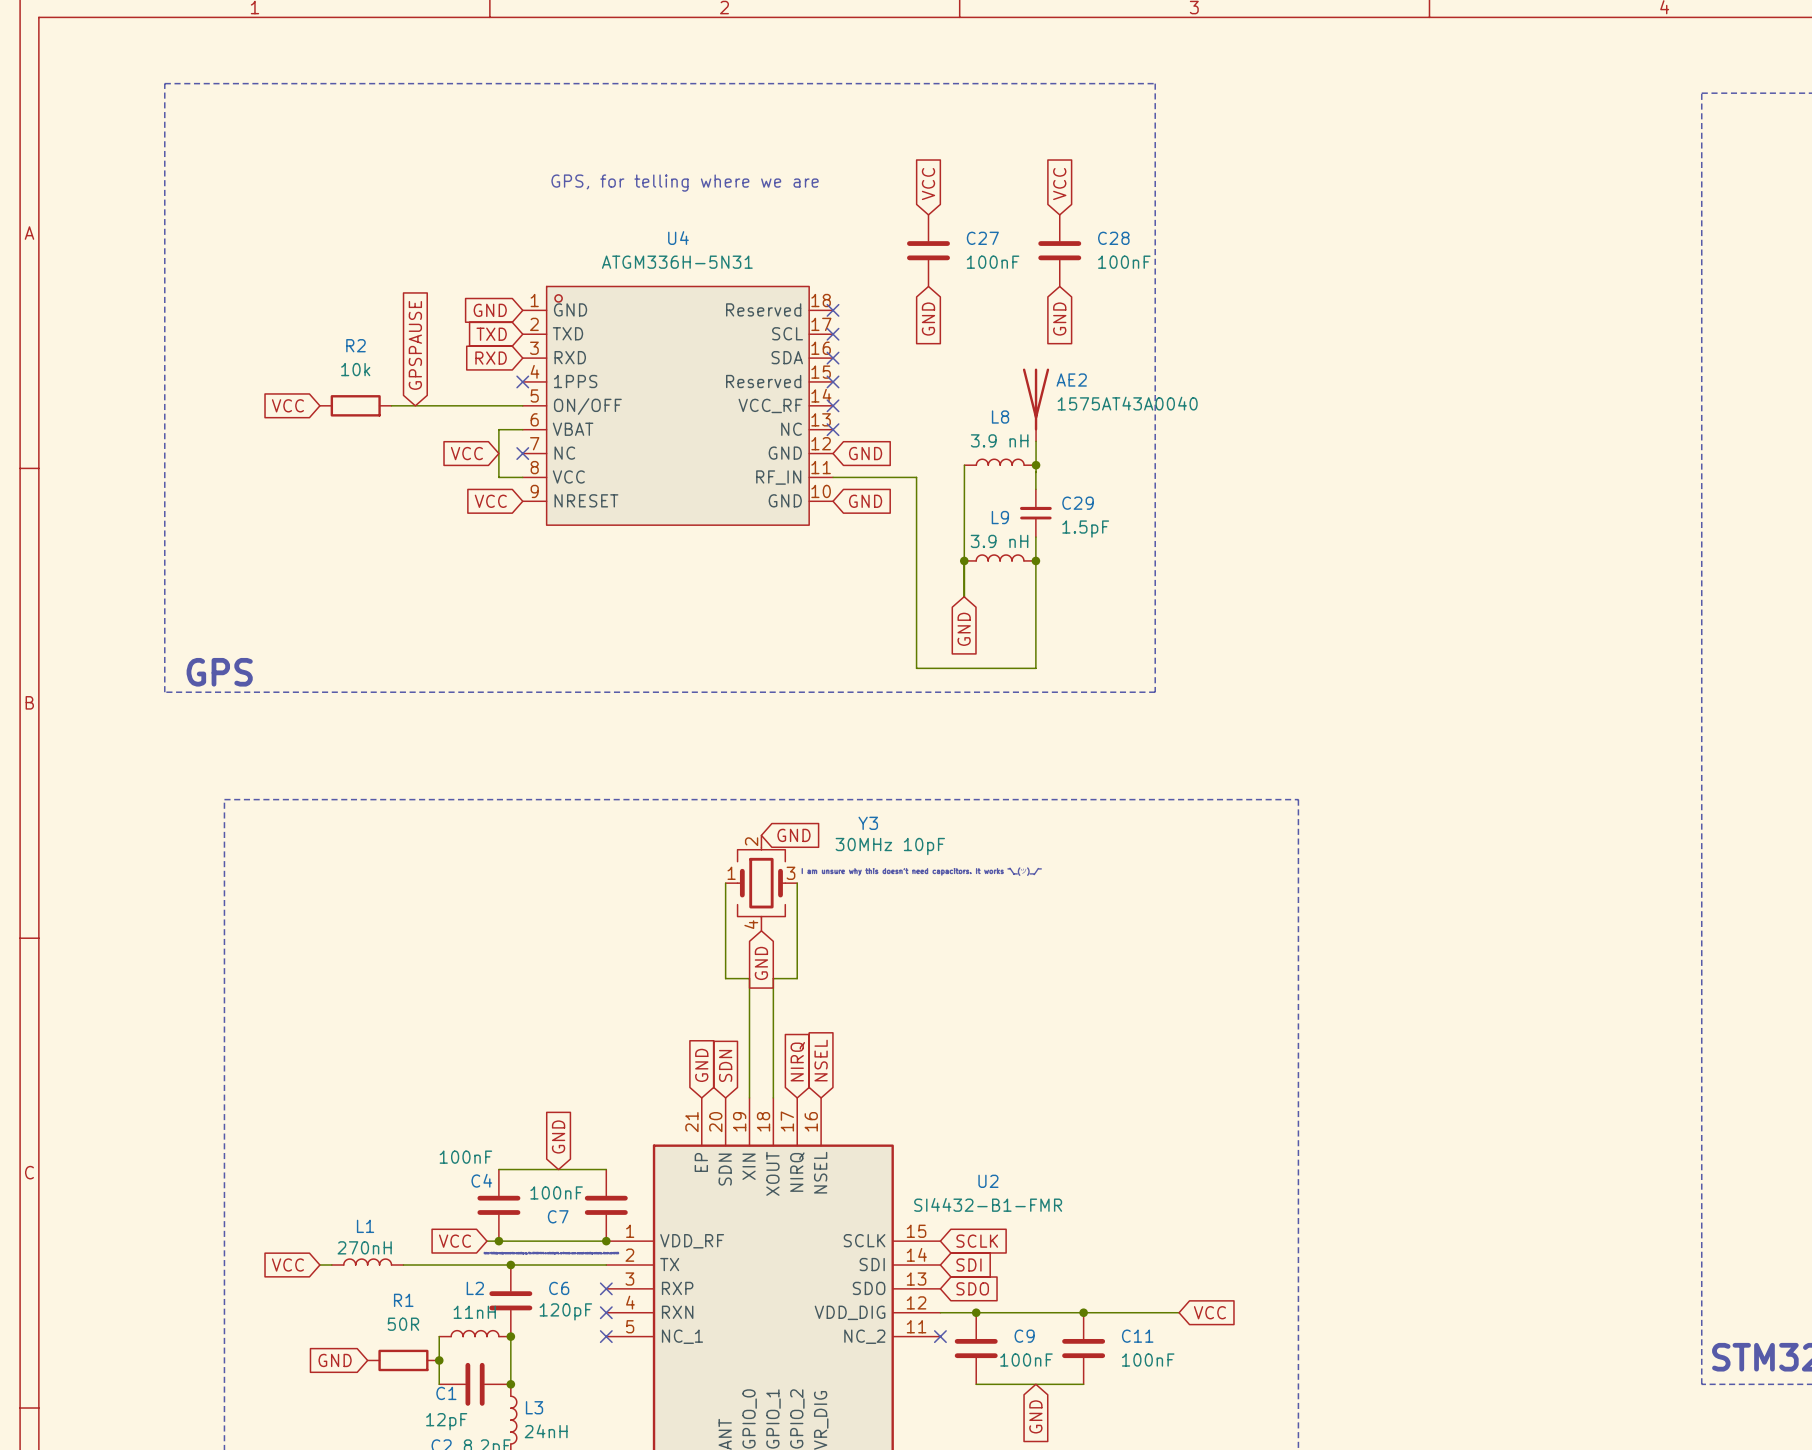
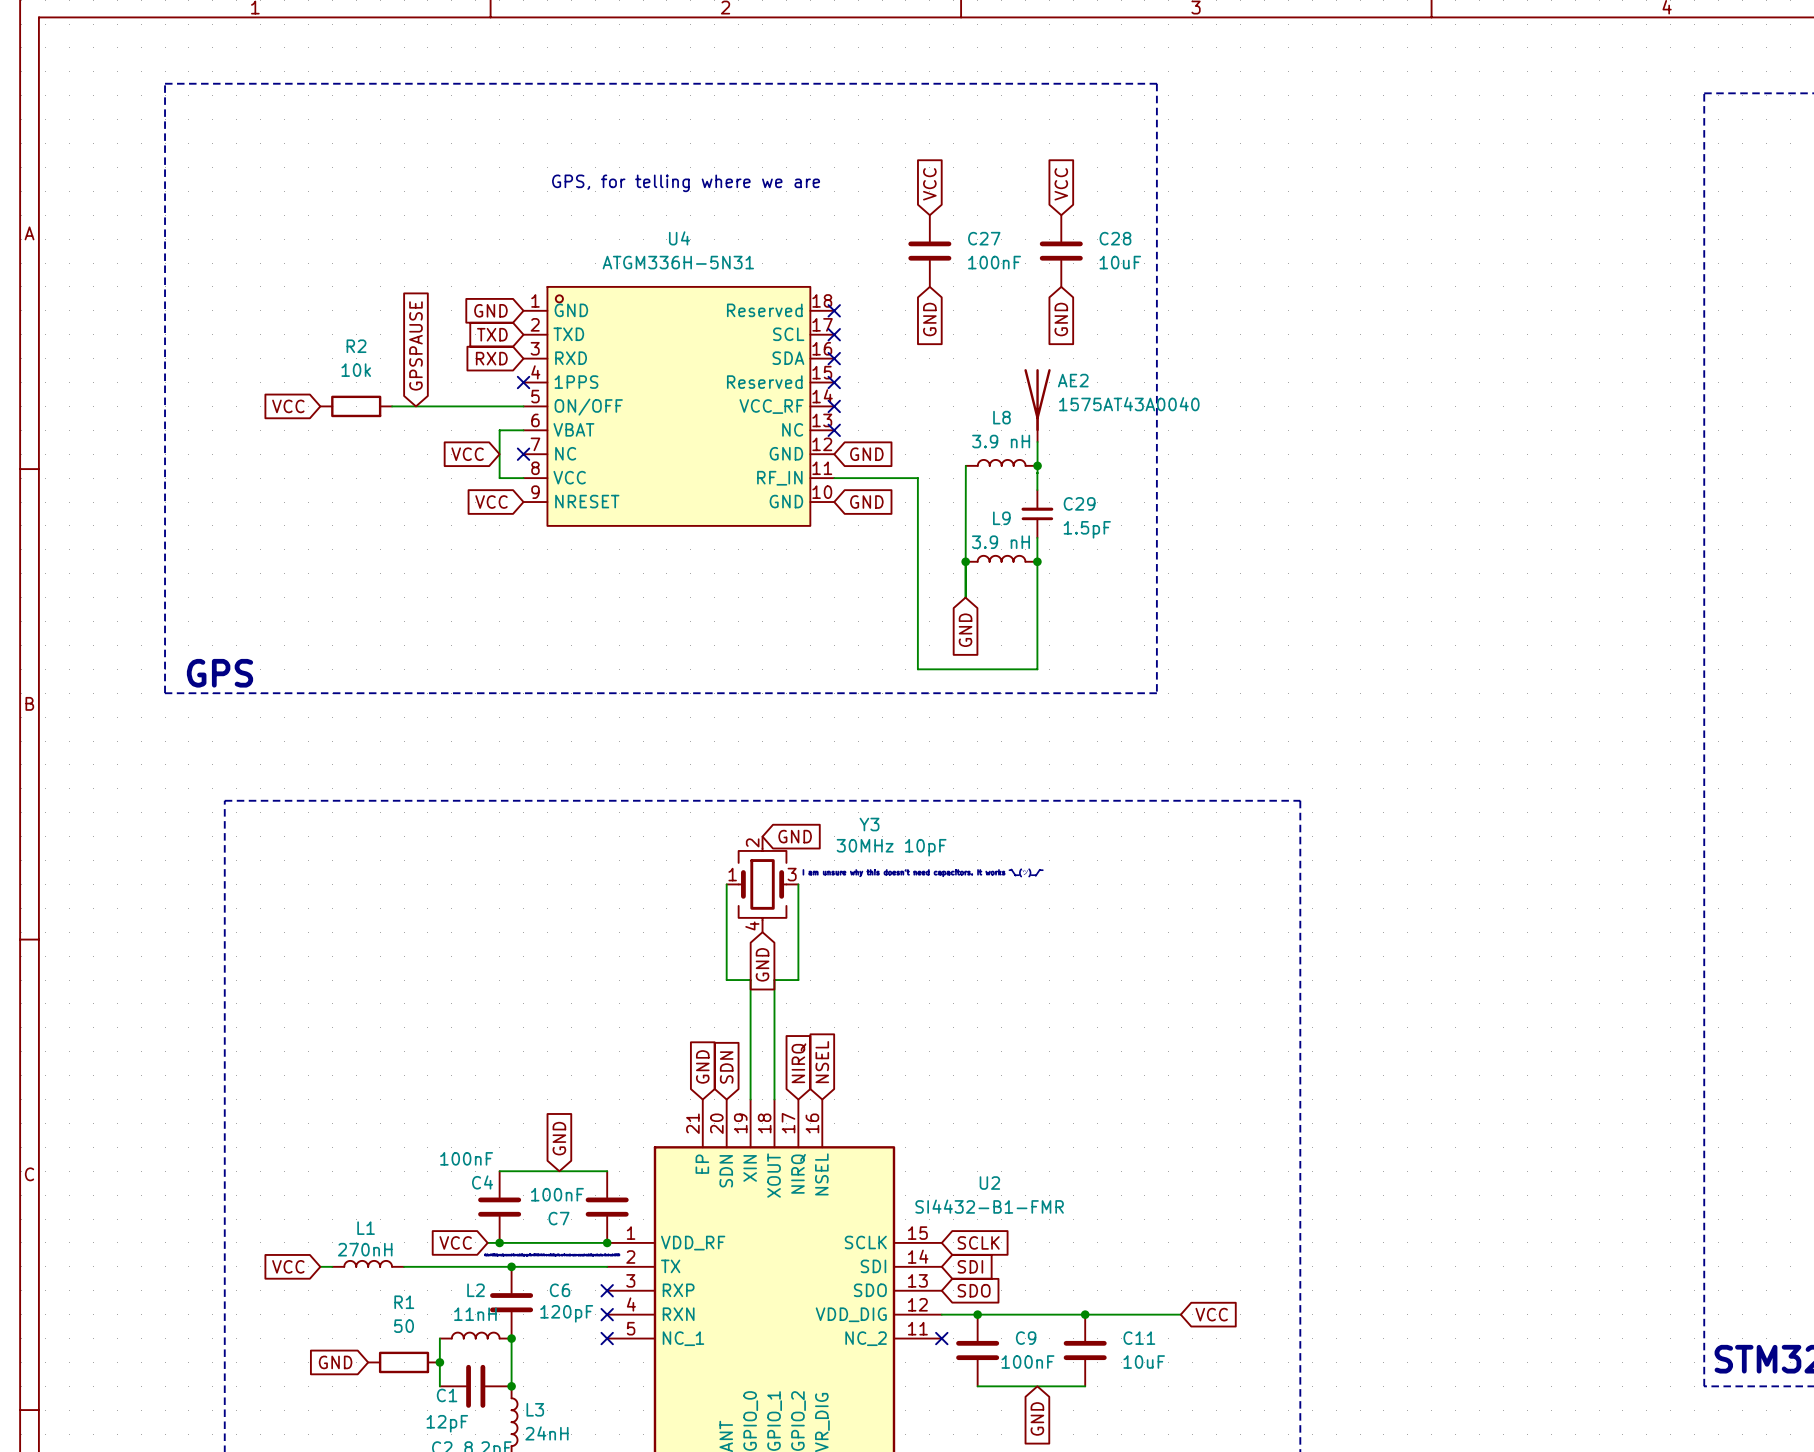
C28 value: 100nF (1124, 262) -> 10uF (1120, 262)
R1 value: 50R (403, 1324) -> 50 (404, 1326)
C11 value: 100nF (1148, 1360) -> 10uF (1144, 1362)

